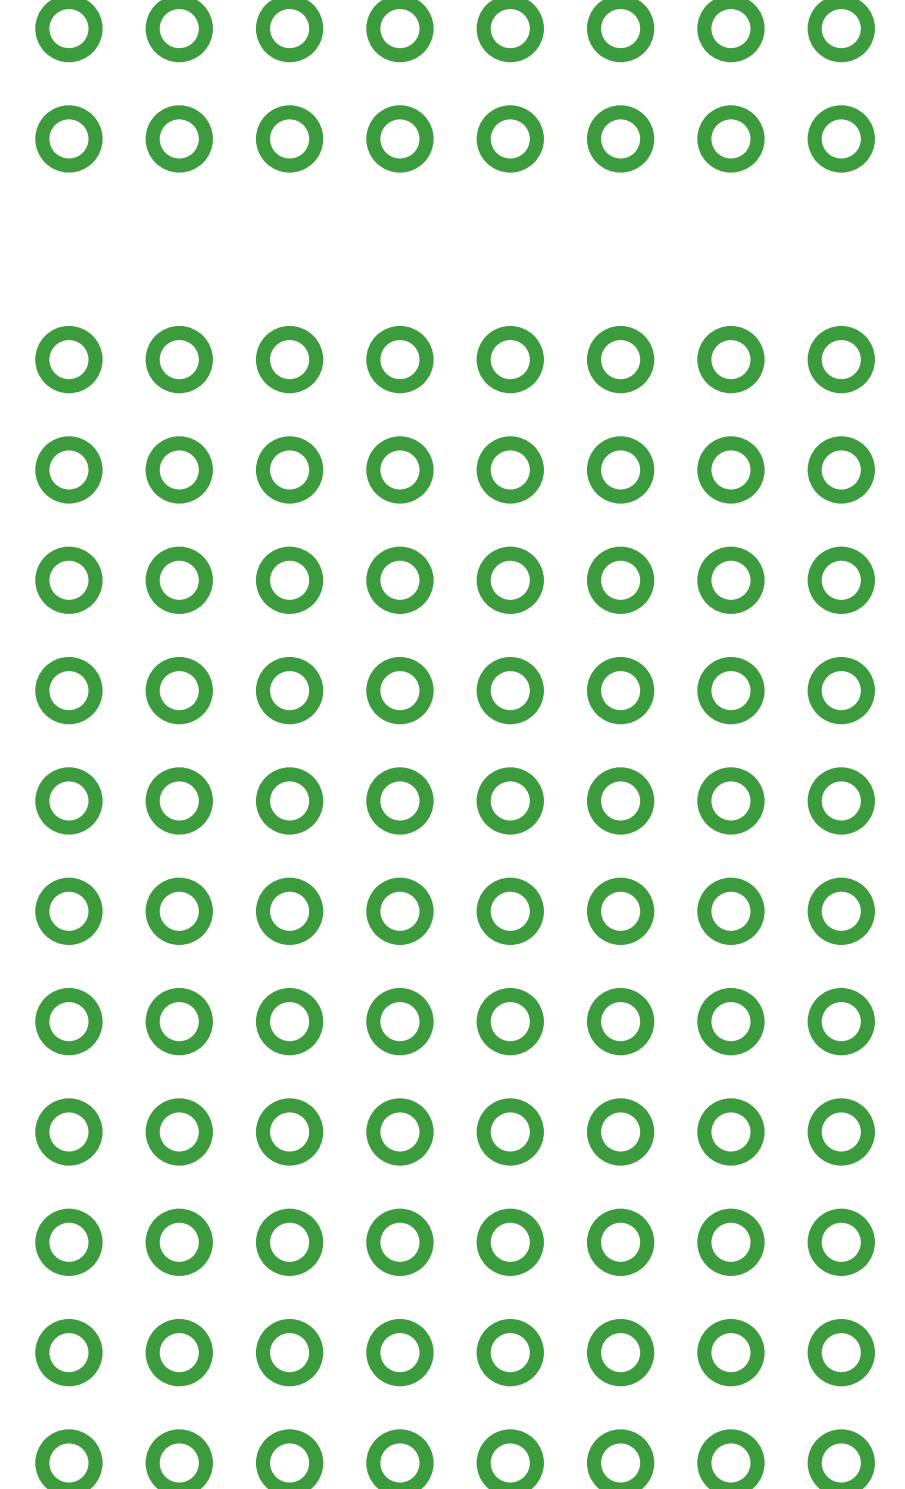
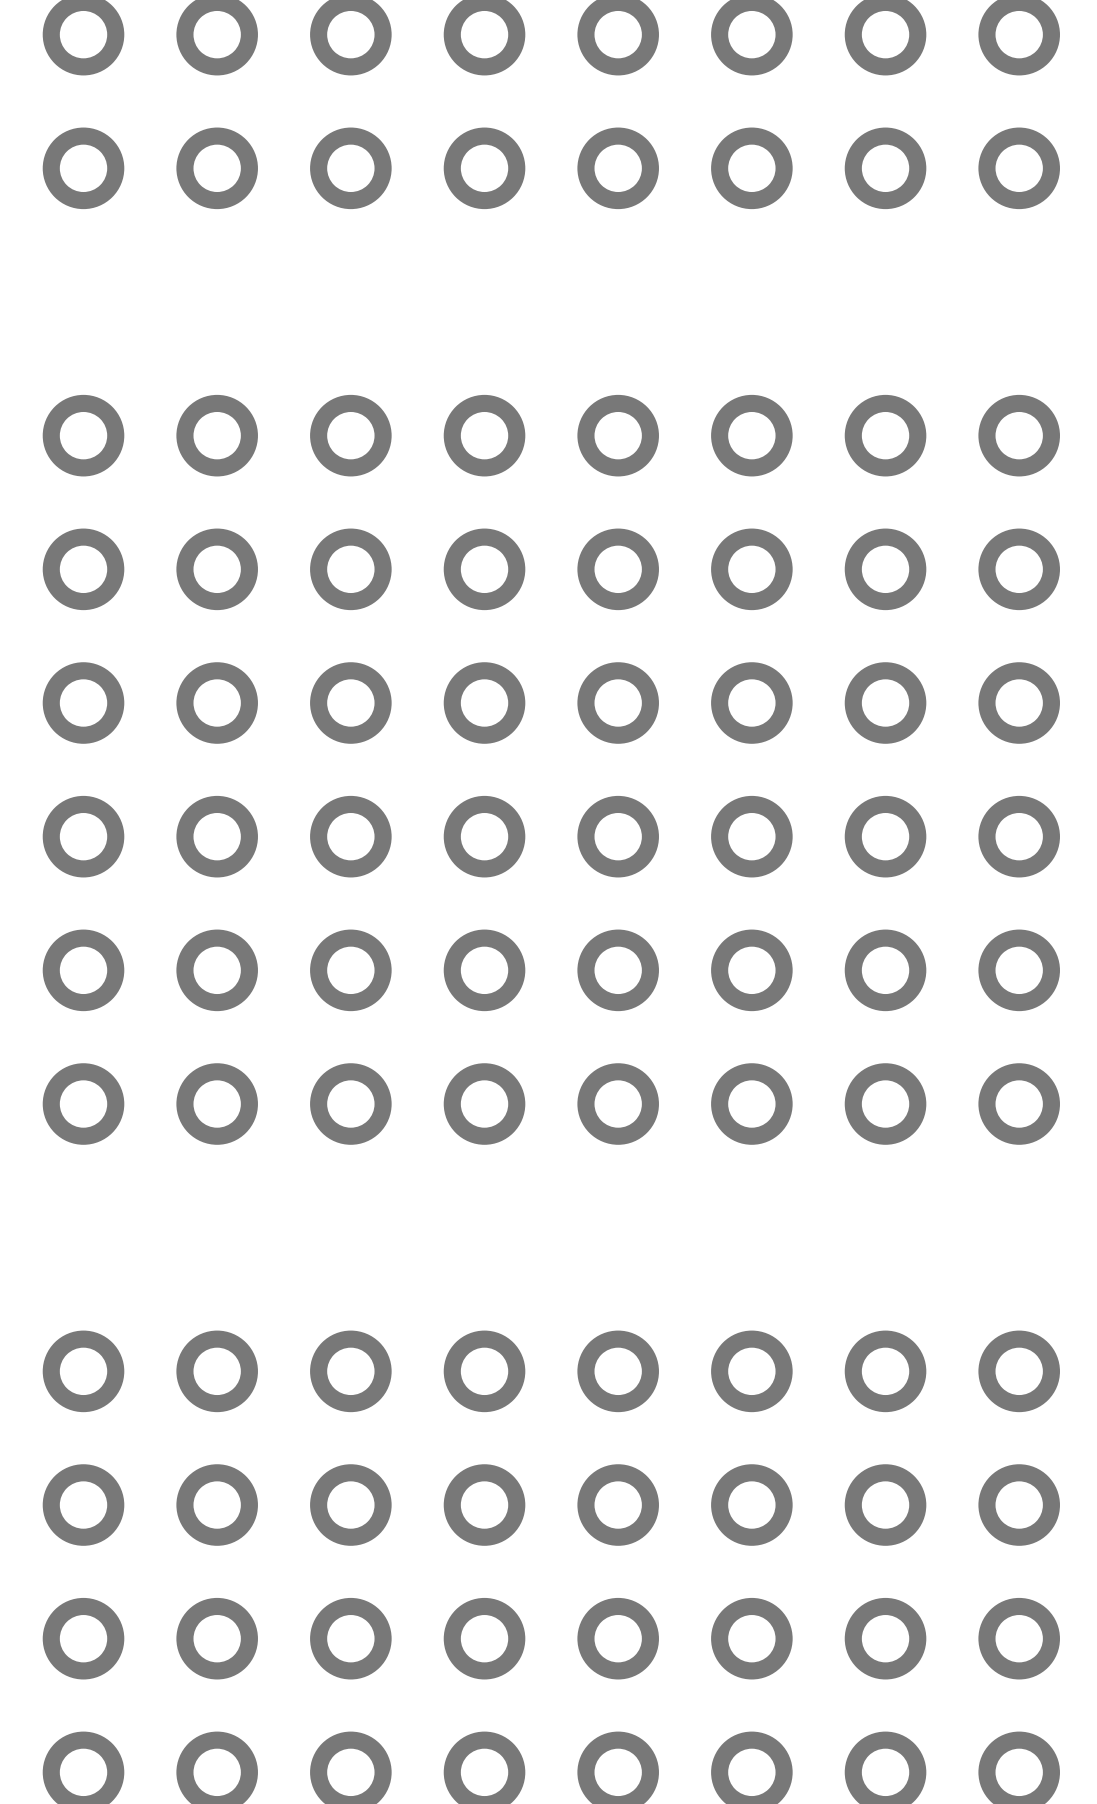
via: (68, 1021) -> none
via: (179, 1021) -> none
via: (289, 1021) -> none
via: (399, 1021) -> none
via: (510, 1021) -> none
via: (620, 1021) -> none
via: (730, 1021) -> none
via: (841, 1021) -> none

